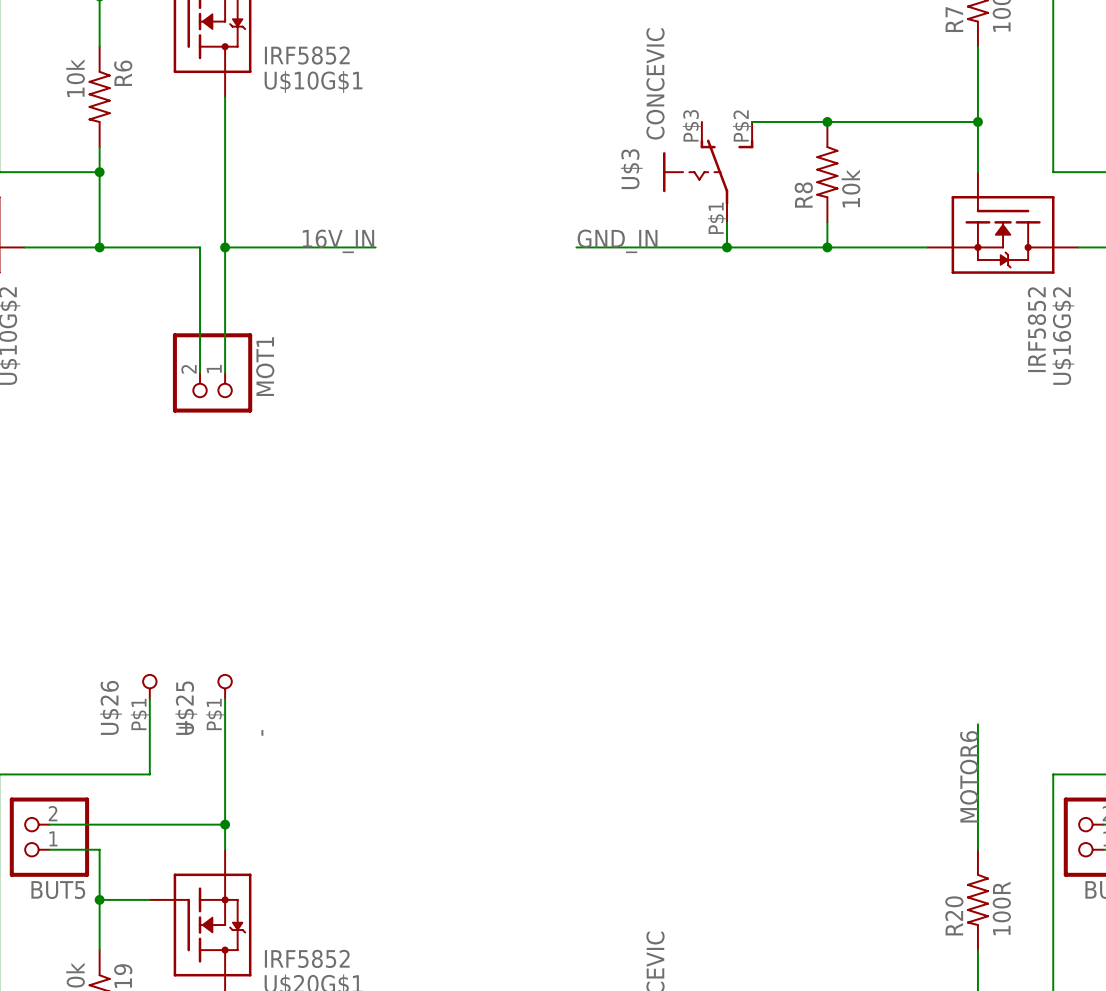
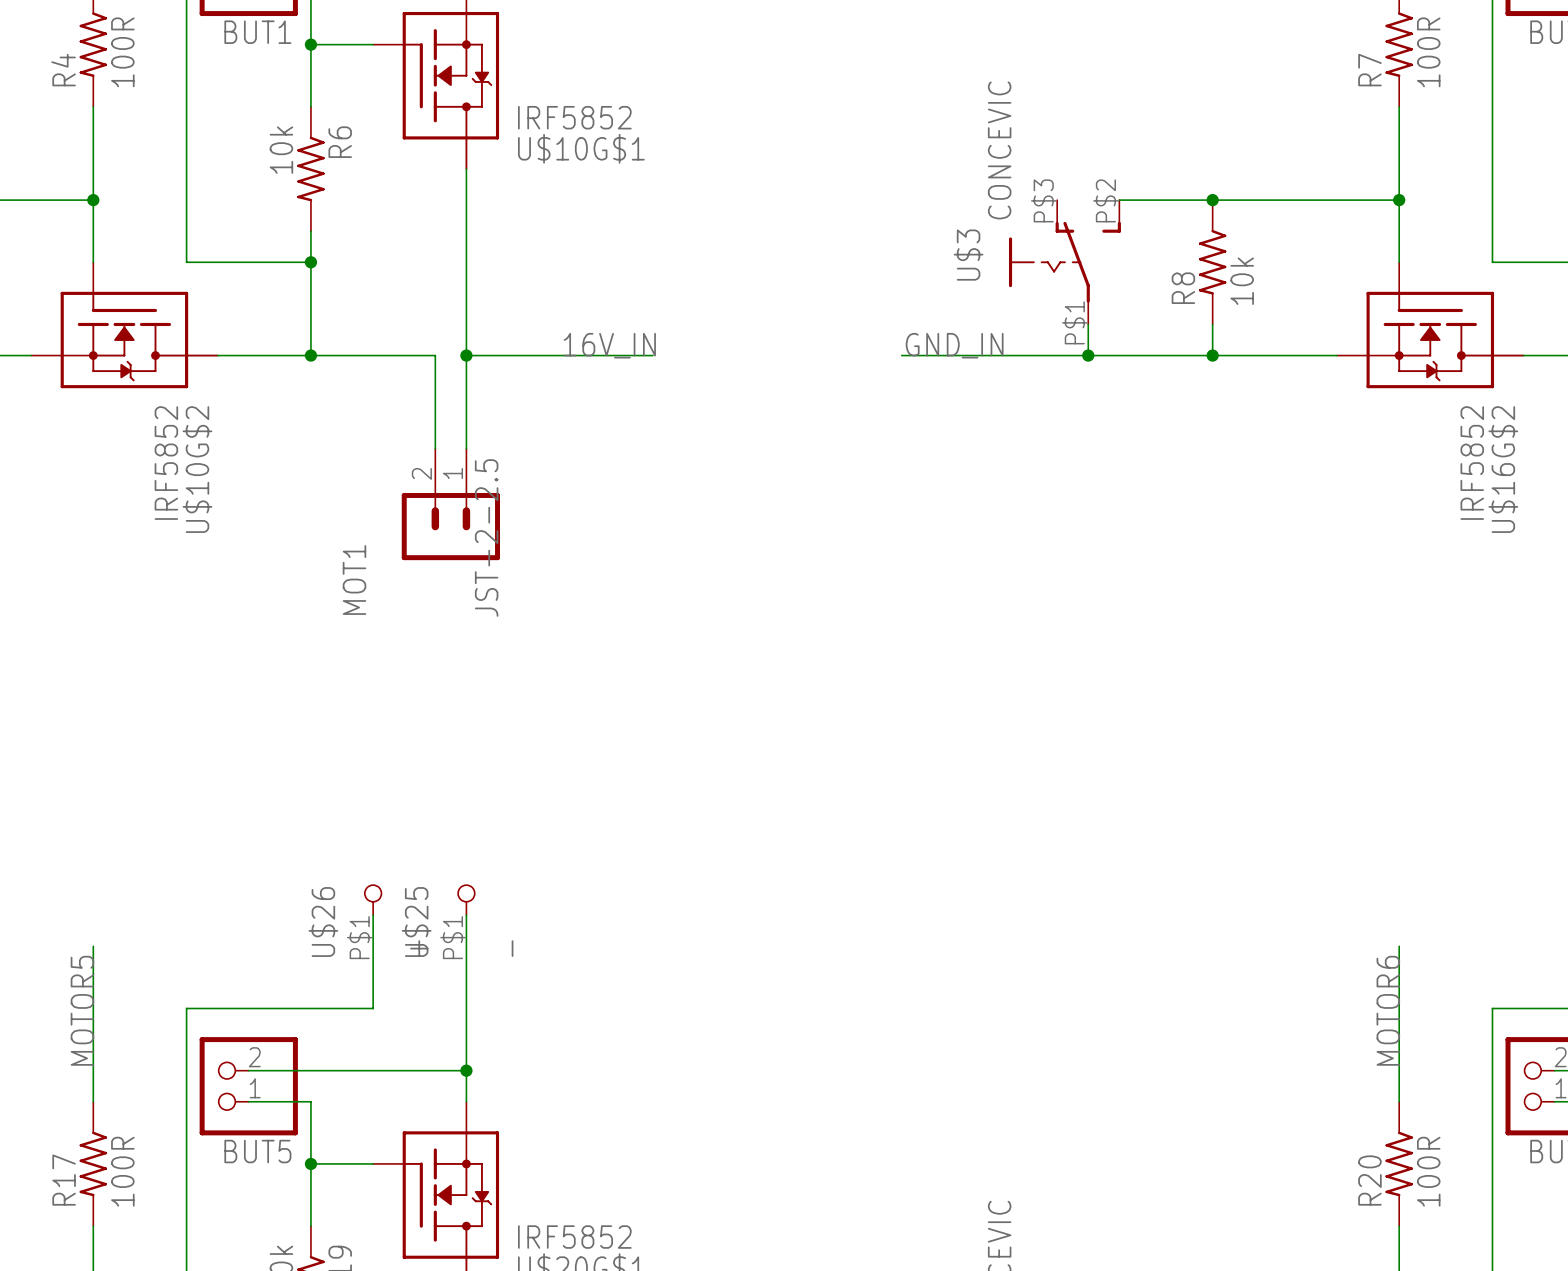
MOT1 symbol: [172, 333, 253, 413] -> [401, 448, 501, 561]
MOT1 name position: MOT1 (265, 366) -> MOT1 (354, 579)
MOT1 value: none -> JST-2-2.5 (486, 538)

